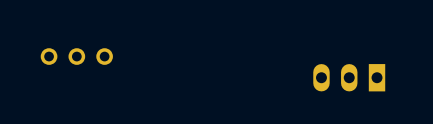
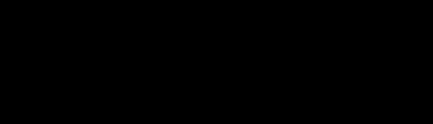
part: (76, 56) -> none
part: (349, 77) -> none

